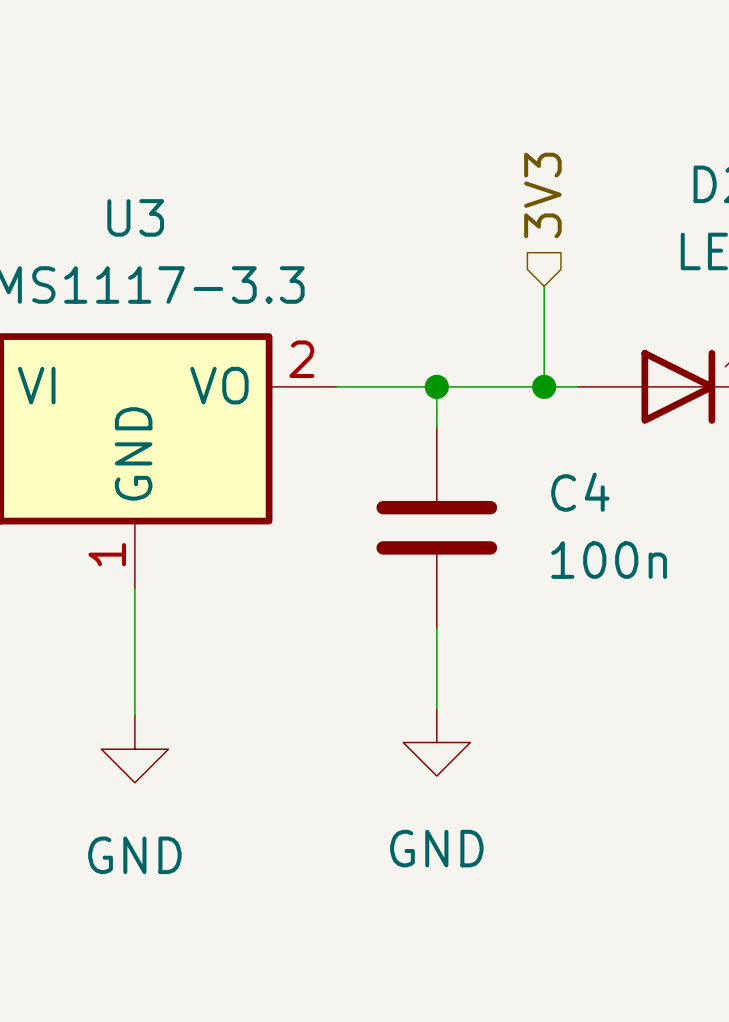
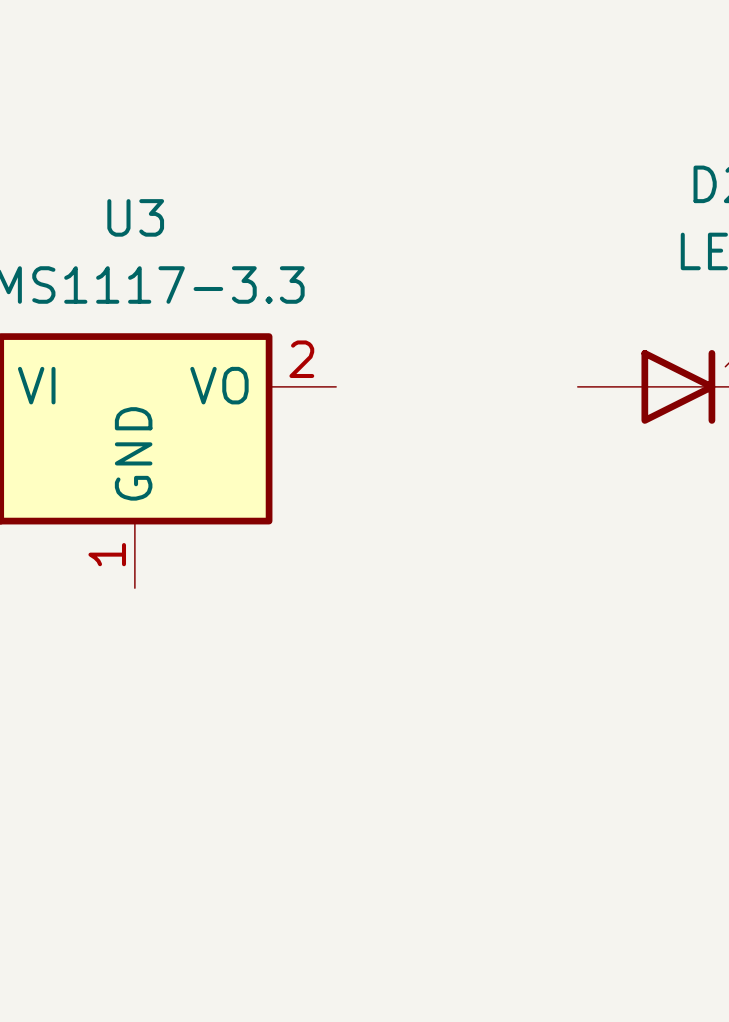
hierarchical label: 3V3 (542, 195) -> none
wire: (544, 286) (544, 386) -> none
wire: (336, 386) (577, 386) -> none
wire: (436, 386) (436, 427) -> none
junction: (436, 386) -> none
junction: (544, 386) -> none
C4: 100n (436, 527) -> none
wire: (134, 588) (134, 715) -> none
wire: (436, 628) (436, 708) -> none
power symbol: GND (436, 742) -> none
power symbol: GND (134, 749) -> none

